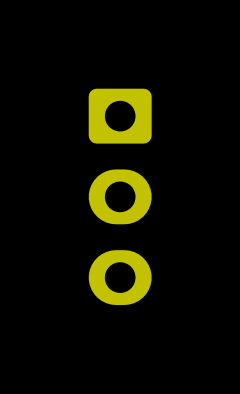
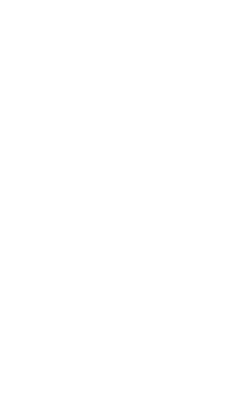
part: (120, 196) -> none

